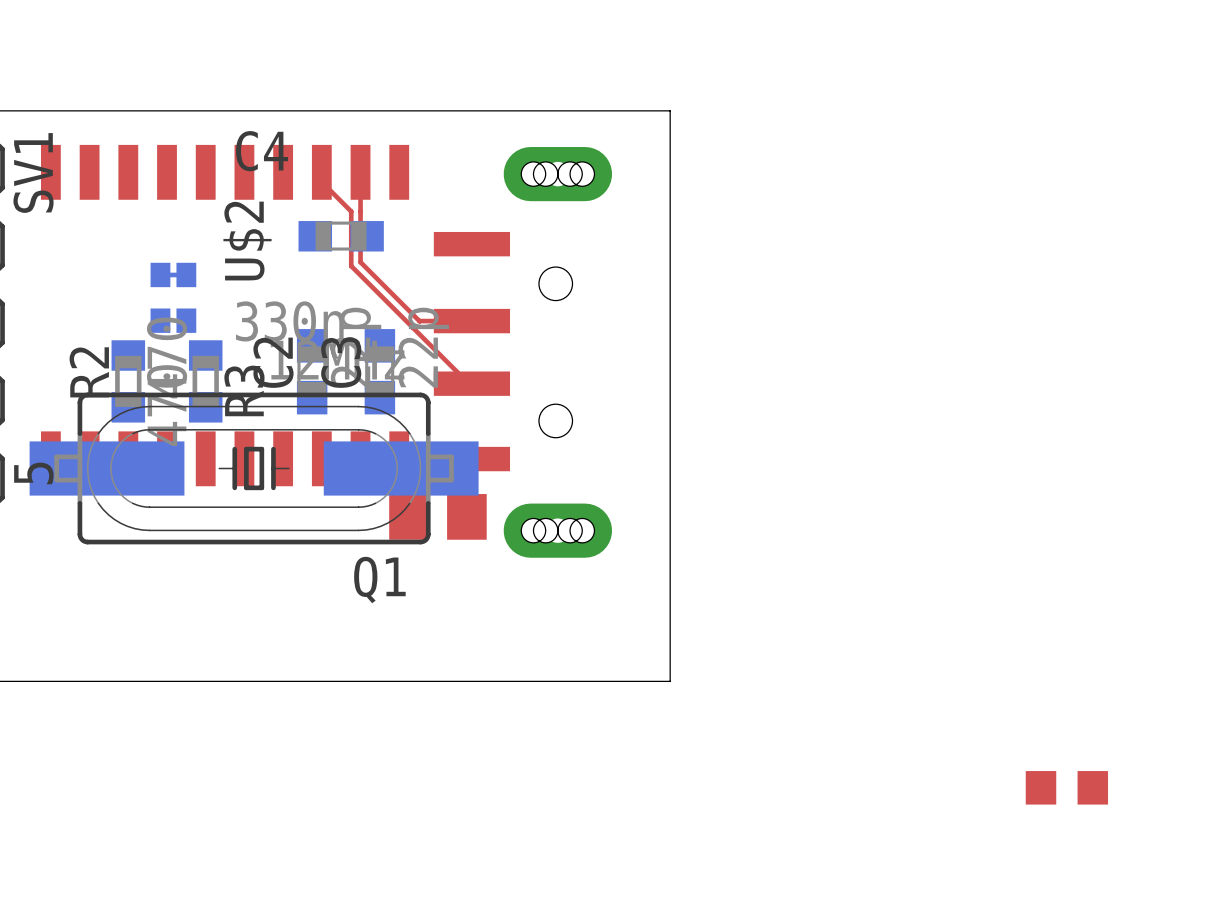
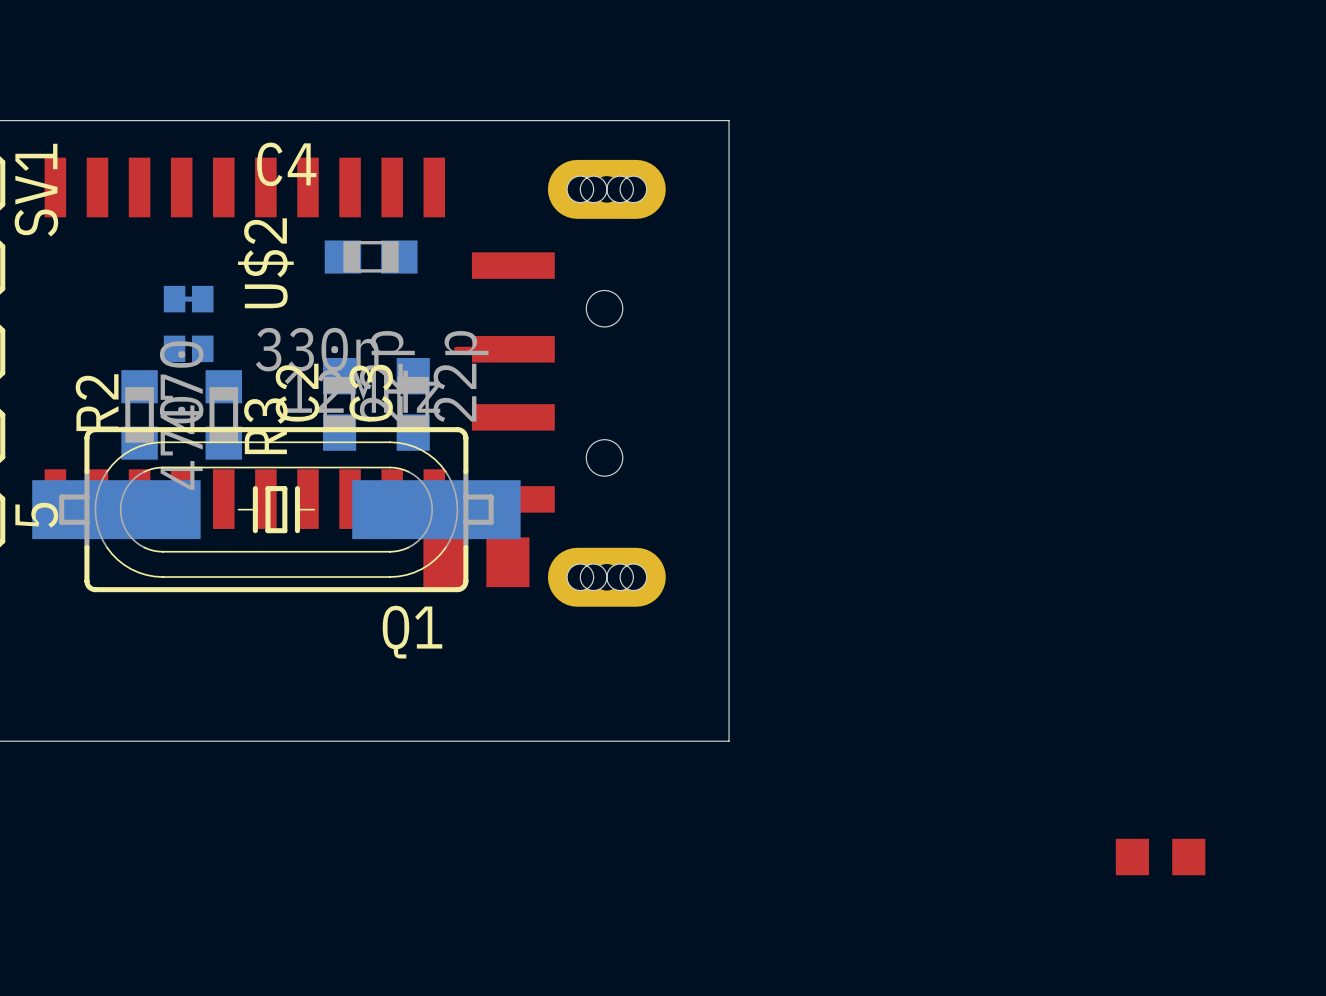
top track: (321, 172) (321, 182) (351, 211) (351, 266) (468, 383) (471, 383) -> none
top track: (360, 172) (360, 262) (419, 321) -> none

